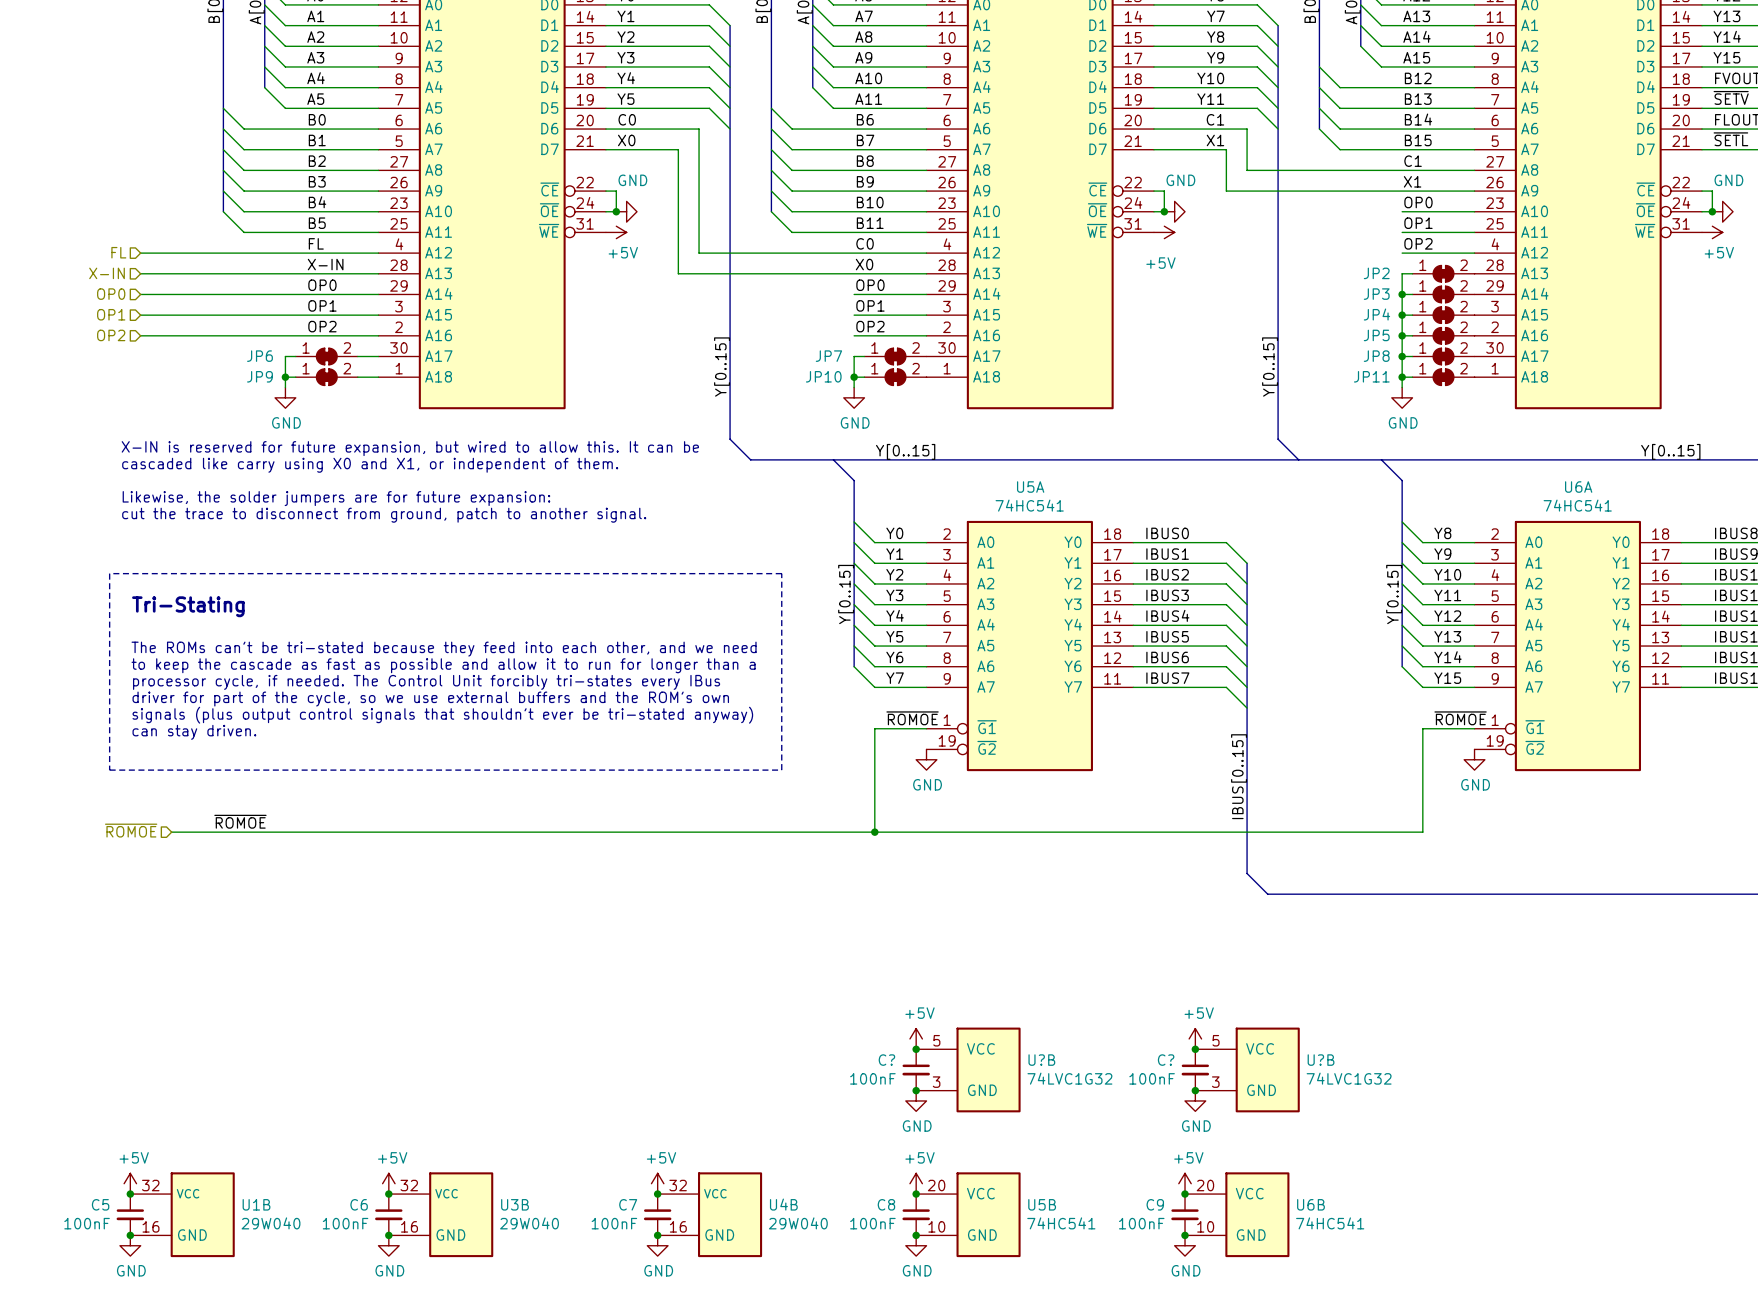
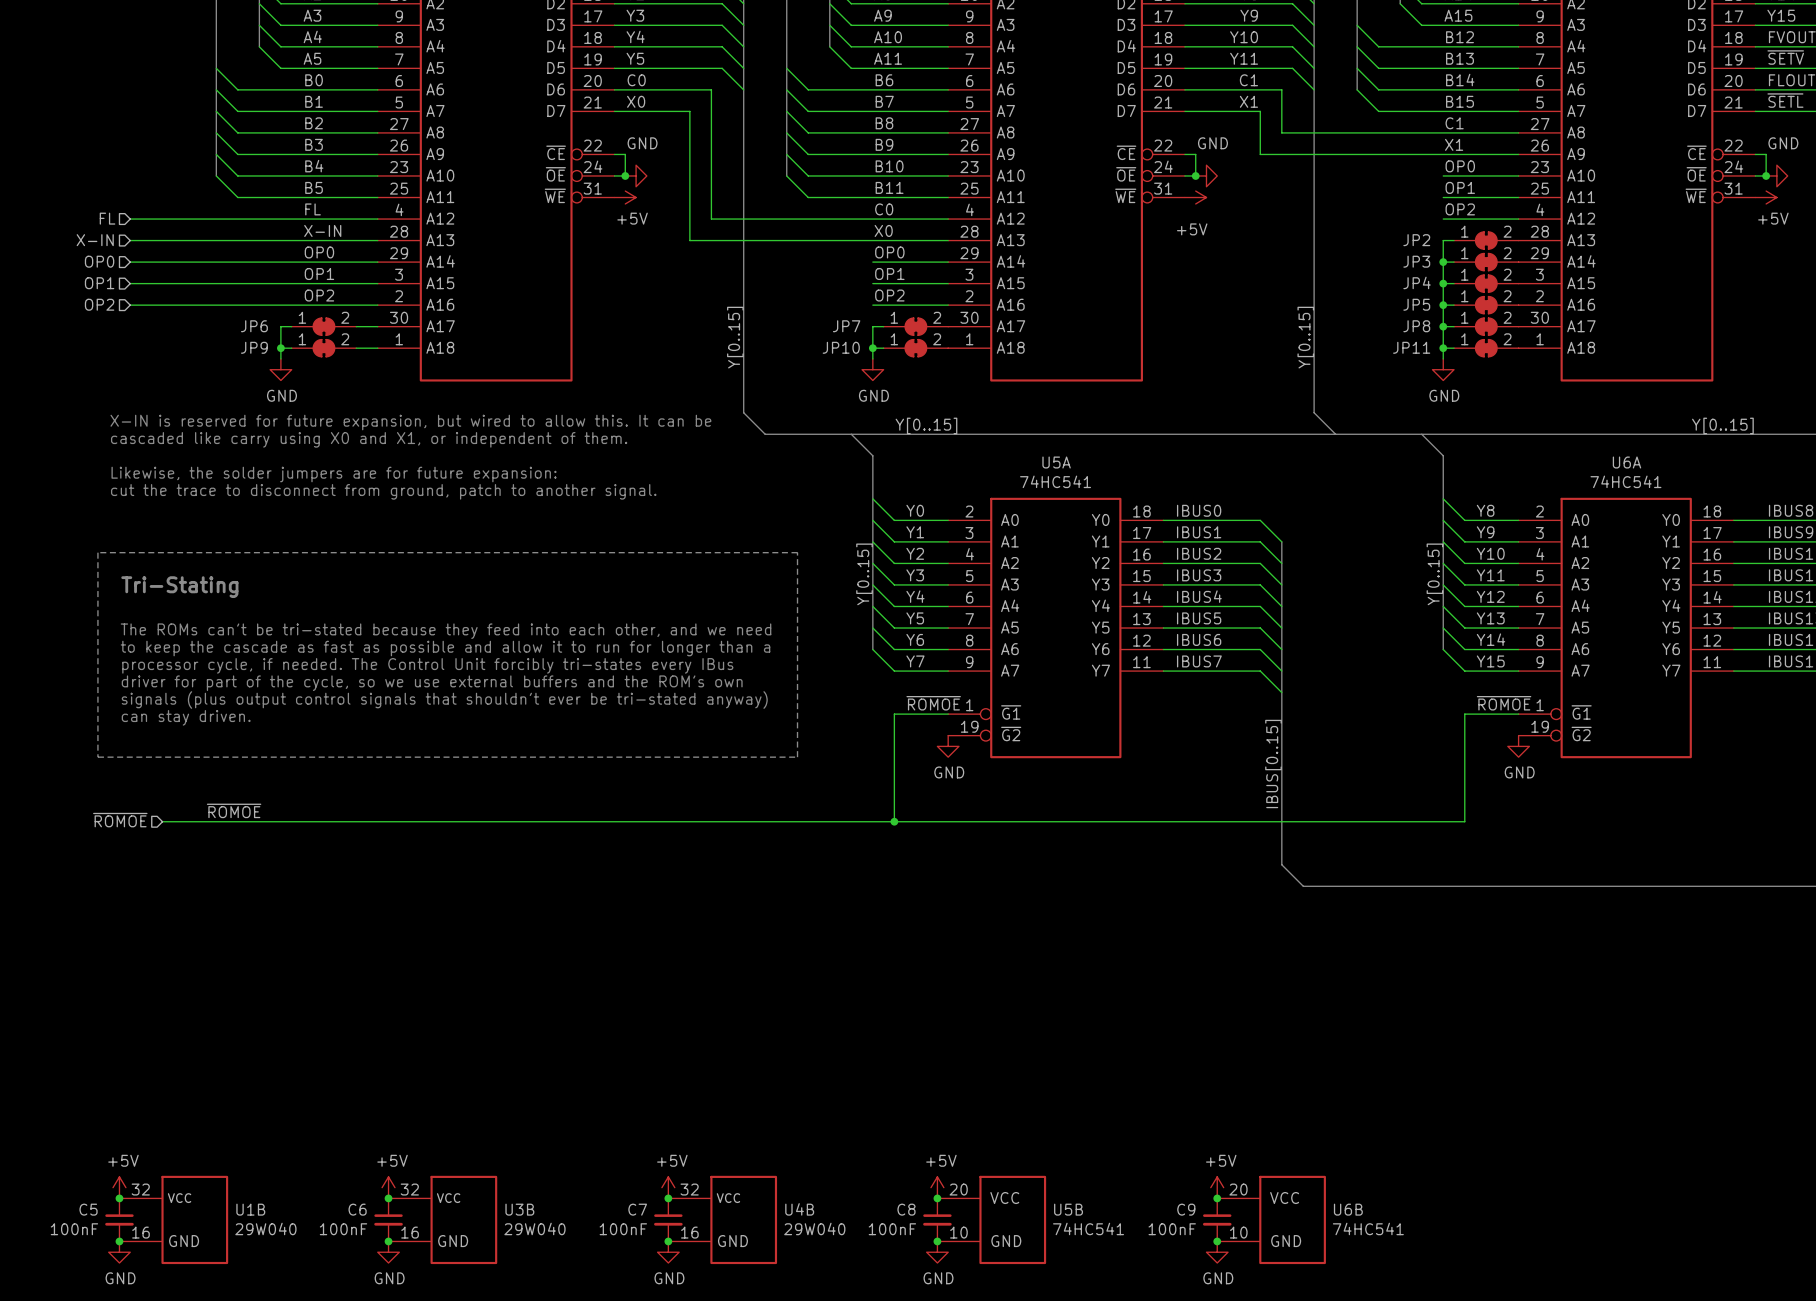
power symbol: +5V (916, 1038) -> none
power symbol: +5V (1195, 1038) -> none
junction: (916, 1049) -> none
junction: (1195, 1049) -> none
C?: 100nF (916, 1069) -> none
U?B: 74LVC1G32 (968, 1069) -> none
C?: 100nF (1195, 1069) -> none
U?B: 74LVC1G32 (1247, 1069) -> none
junction: (916, 1090) -> none
junction: (1195, 1090) -> none
power symbol: GND (916, 1100) -> none
power symbol: GND (1195, 1100) -> none

